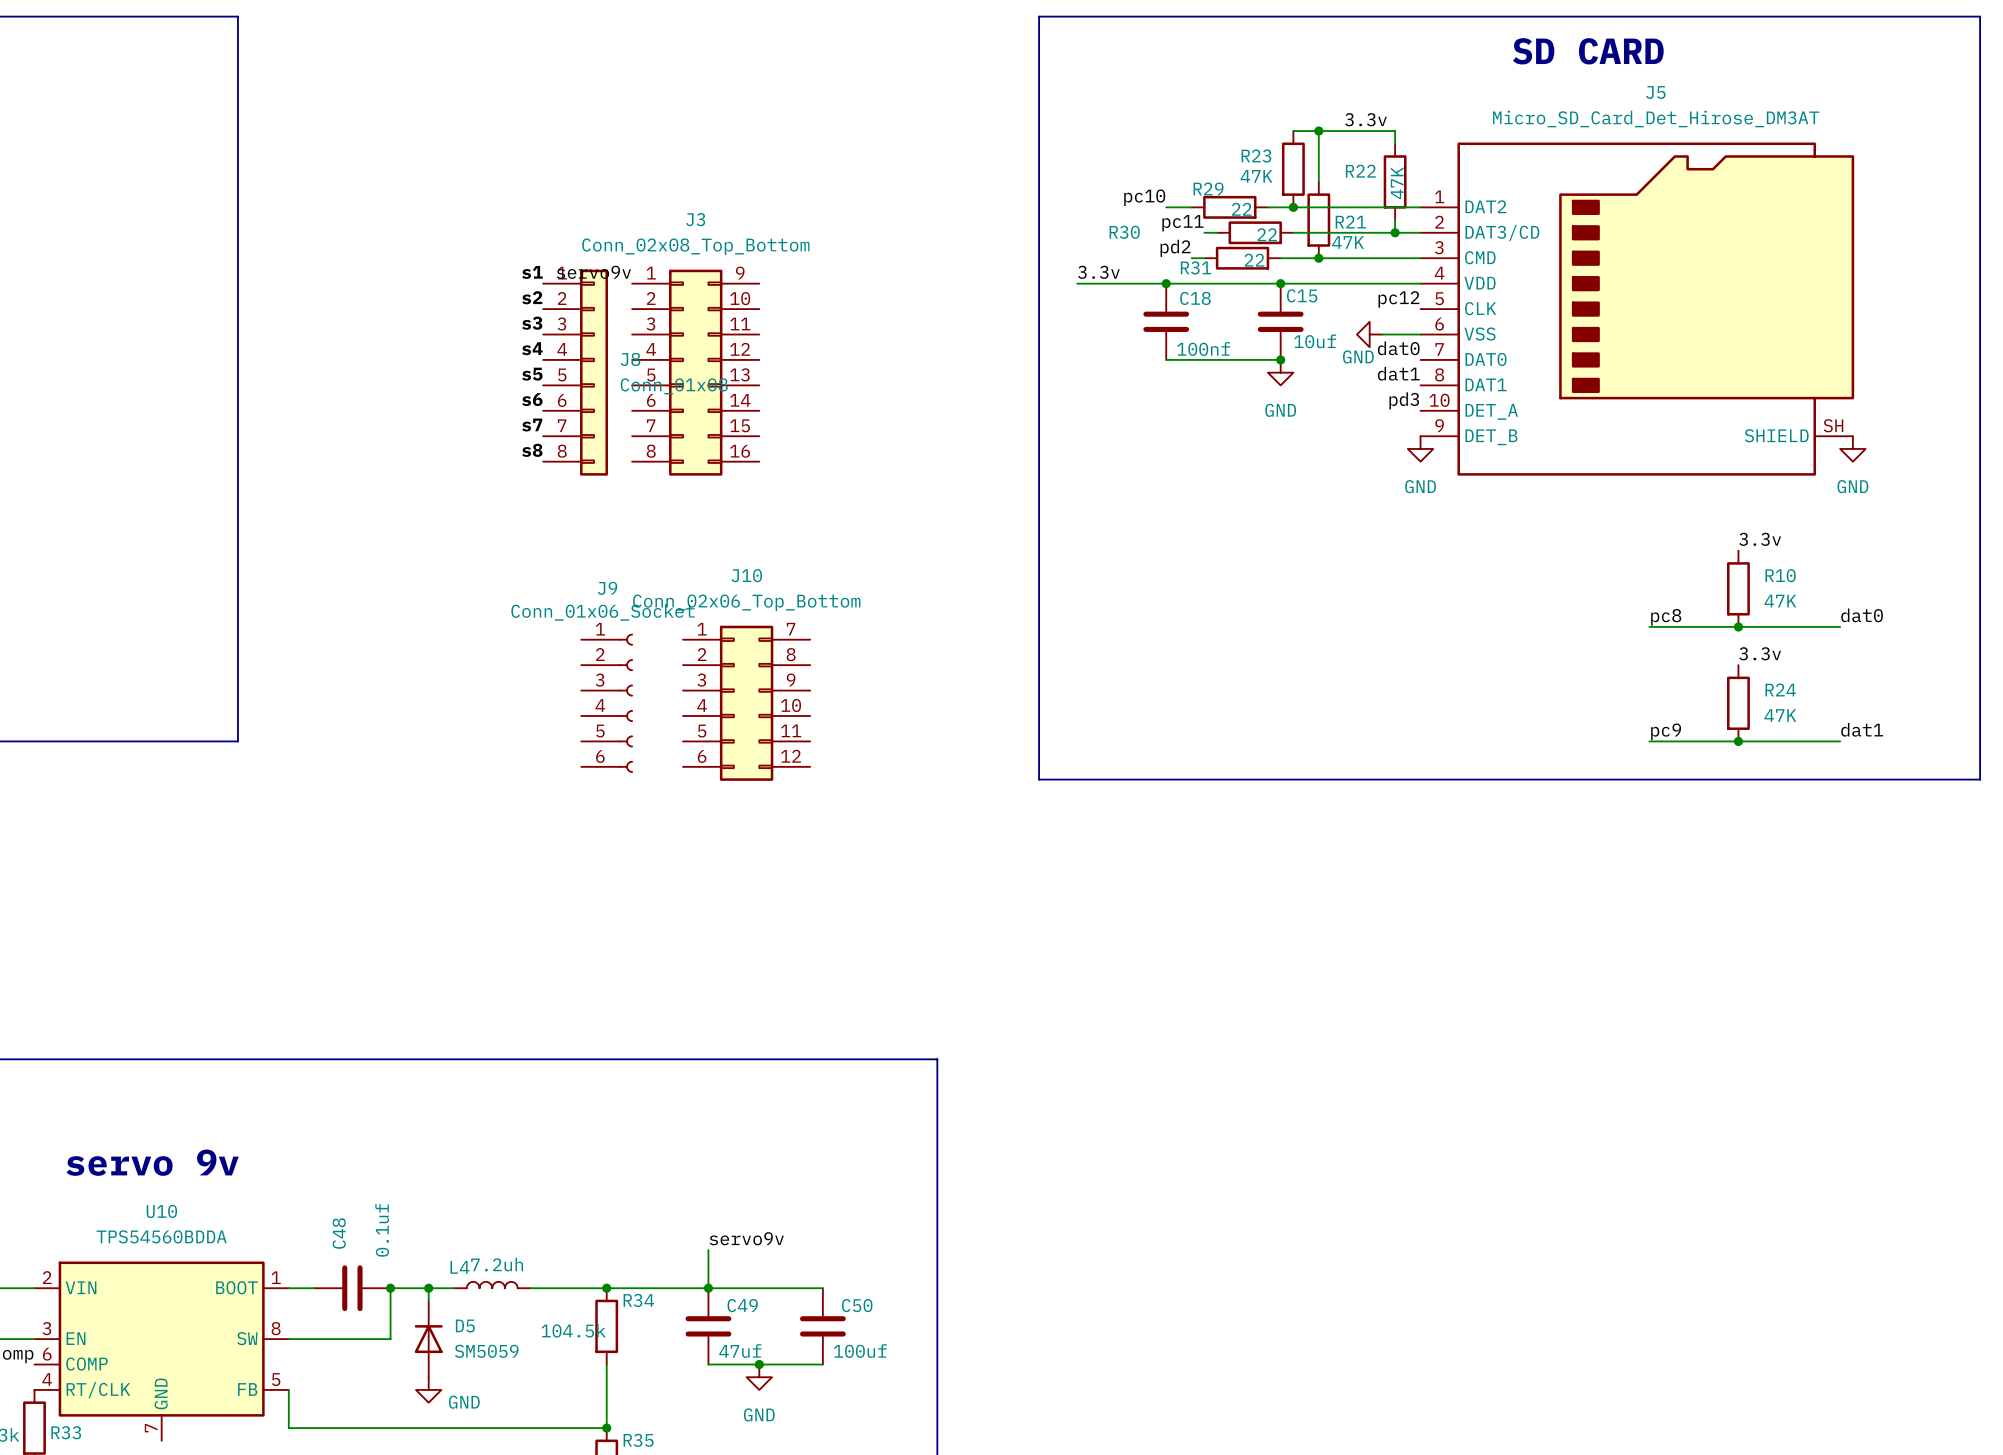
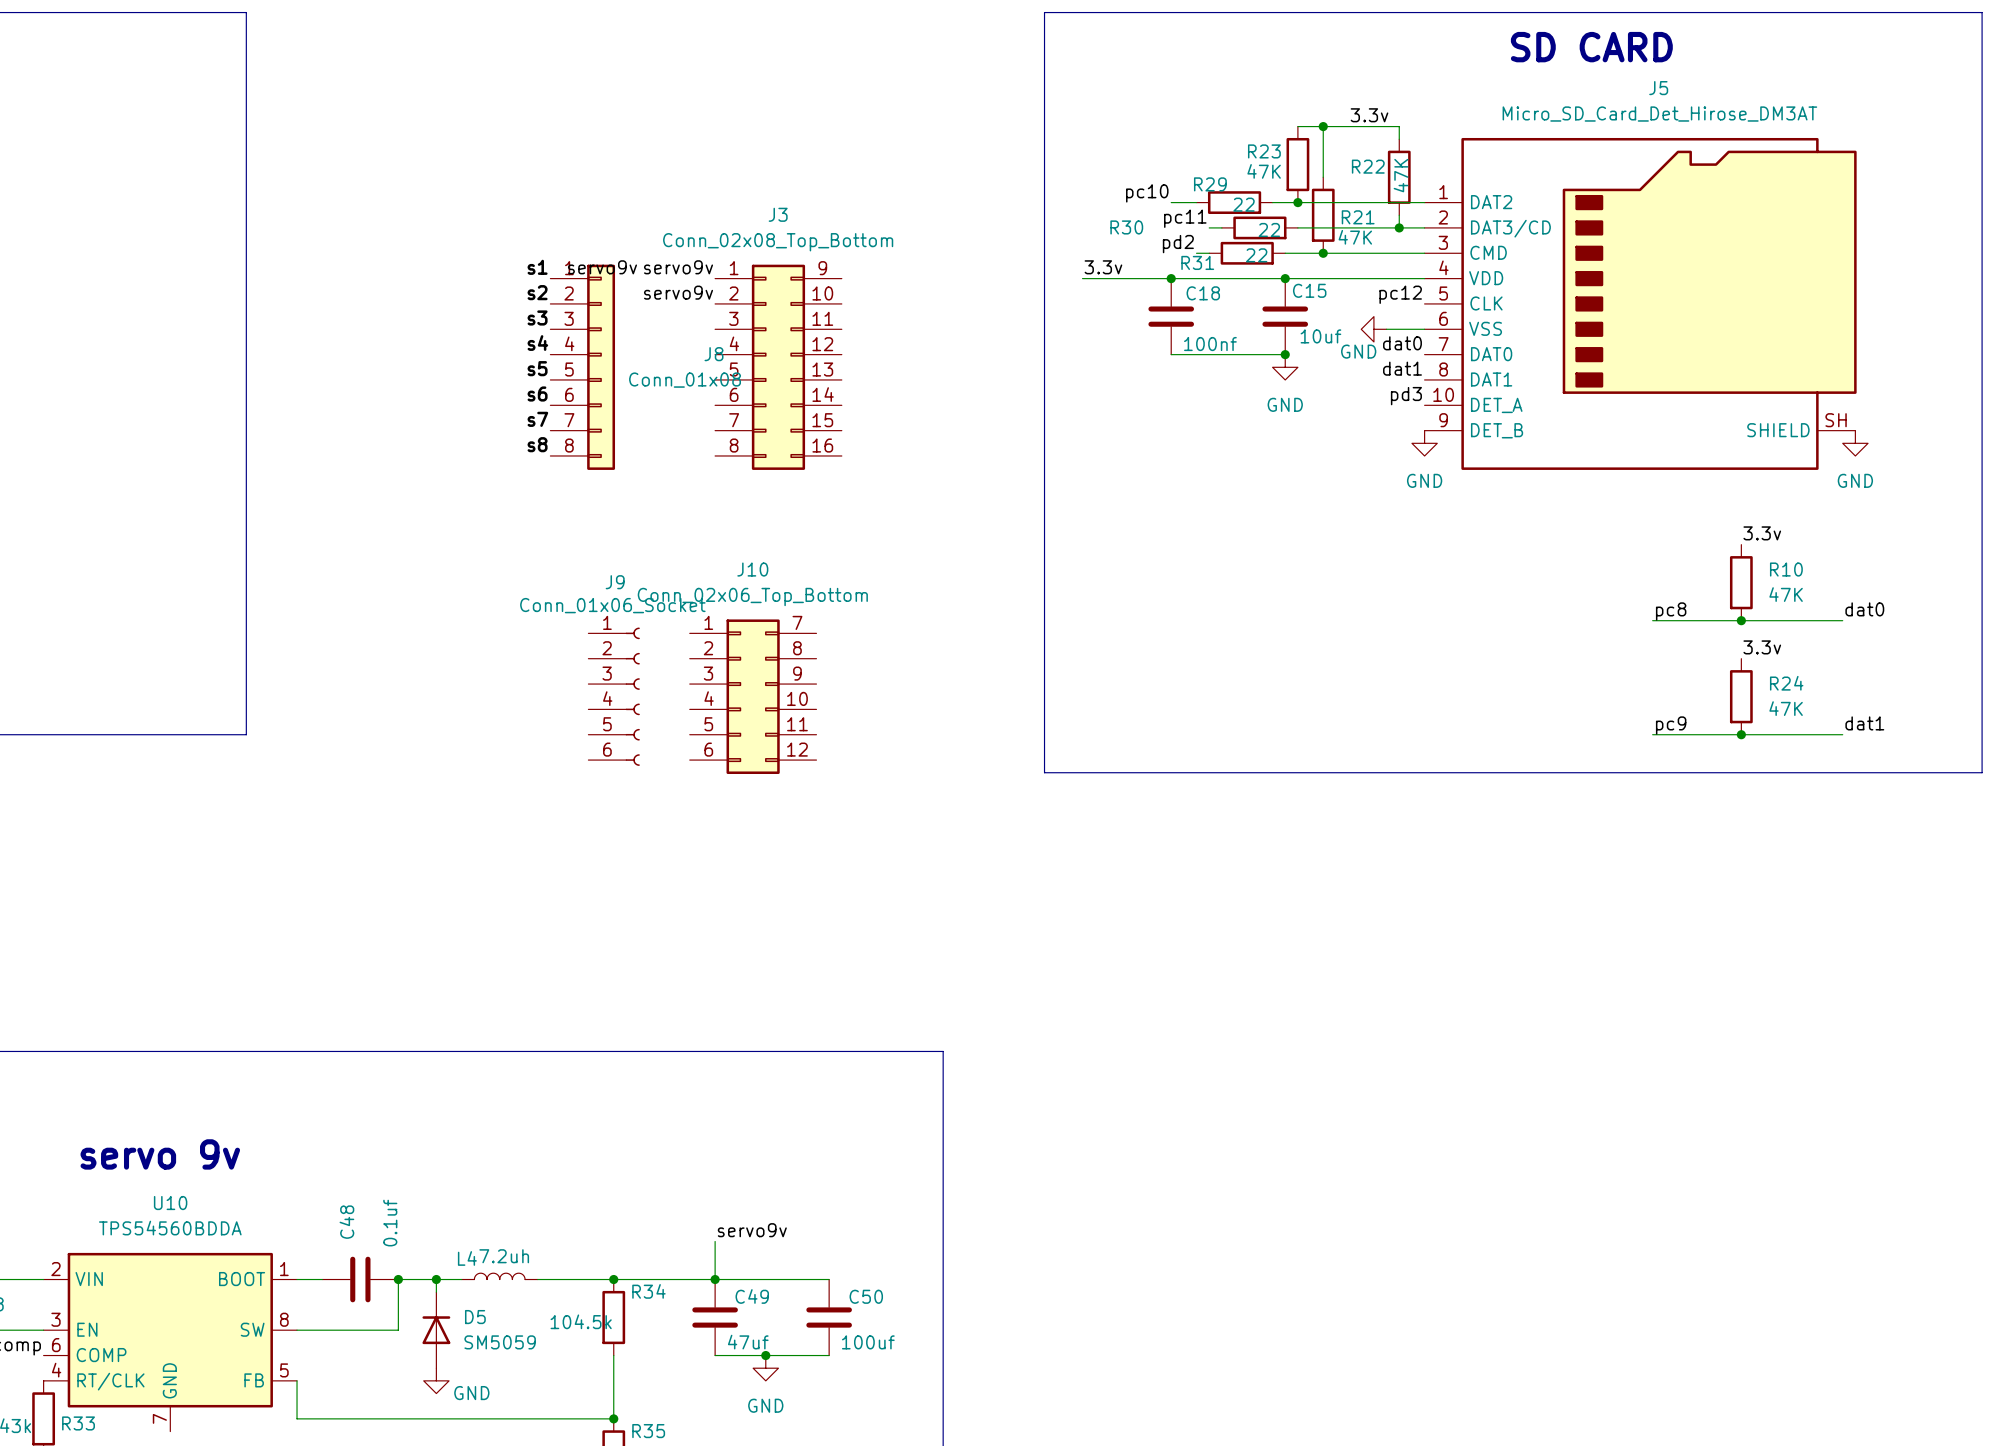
label: none -> servo9v (678, 267)
label: none -> servo9v (678, 292)
J8 name position: J8 (630, 359) -> J8 (714, 354)
J3 position: (695, 372) -> (778, 367)

